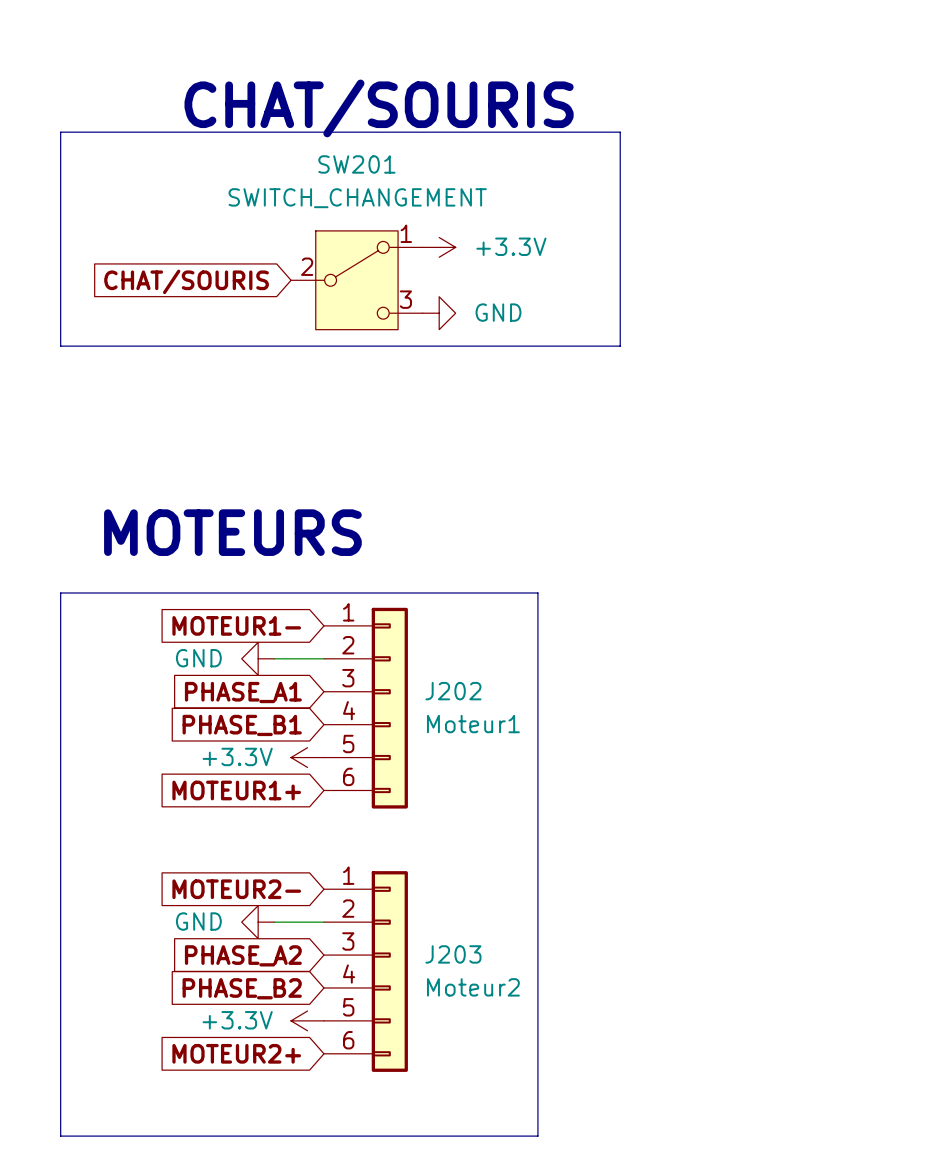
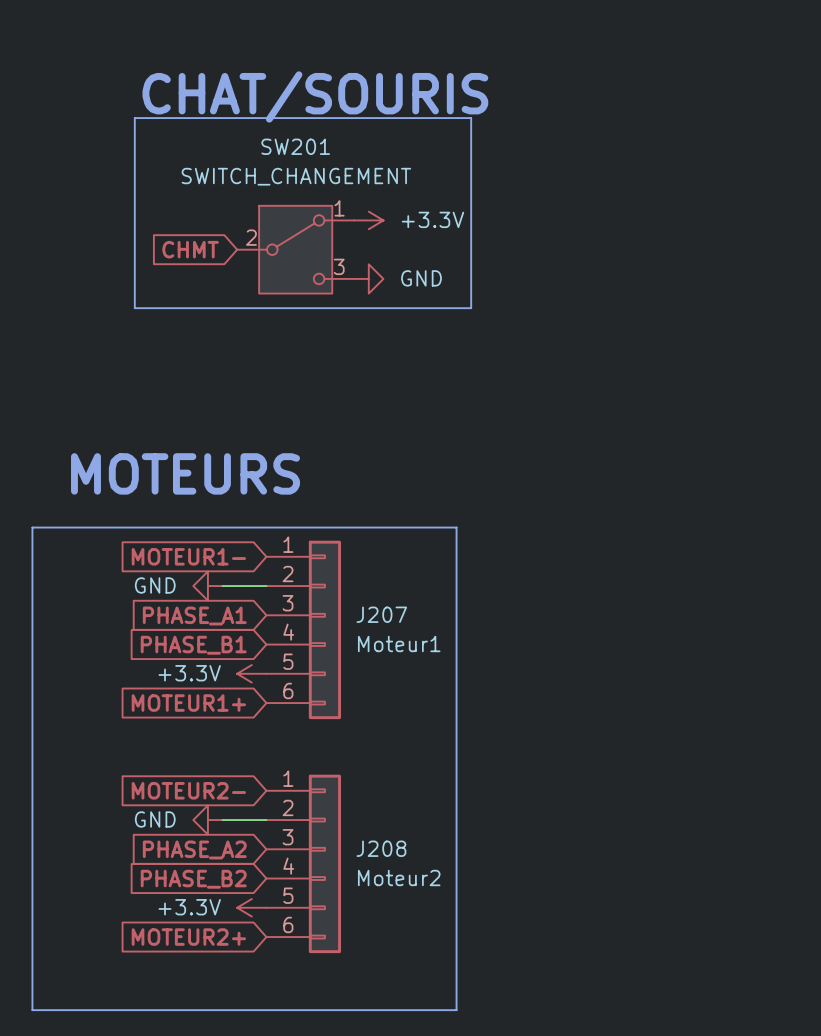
line: (175, 132) (60, 132) (60, 346) (175, 346) -> (134, 118) (134, 308)
line: (554, 132) (620, 132) (620, 346) (554, 346) -> (471, 118) (471, 308)
global label: CHAT/SOURIS (186, 281) -> CHMT (190, 249)
J202 name: J202 (453, 691) -> J207 (381, 614)
J203 name: J203 (453, 954) -> J208 (381, 848)

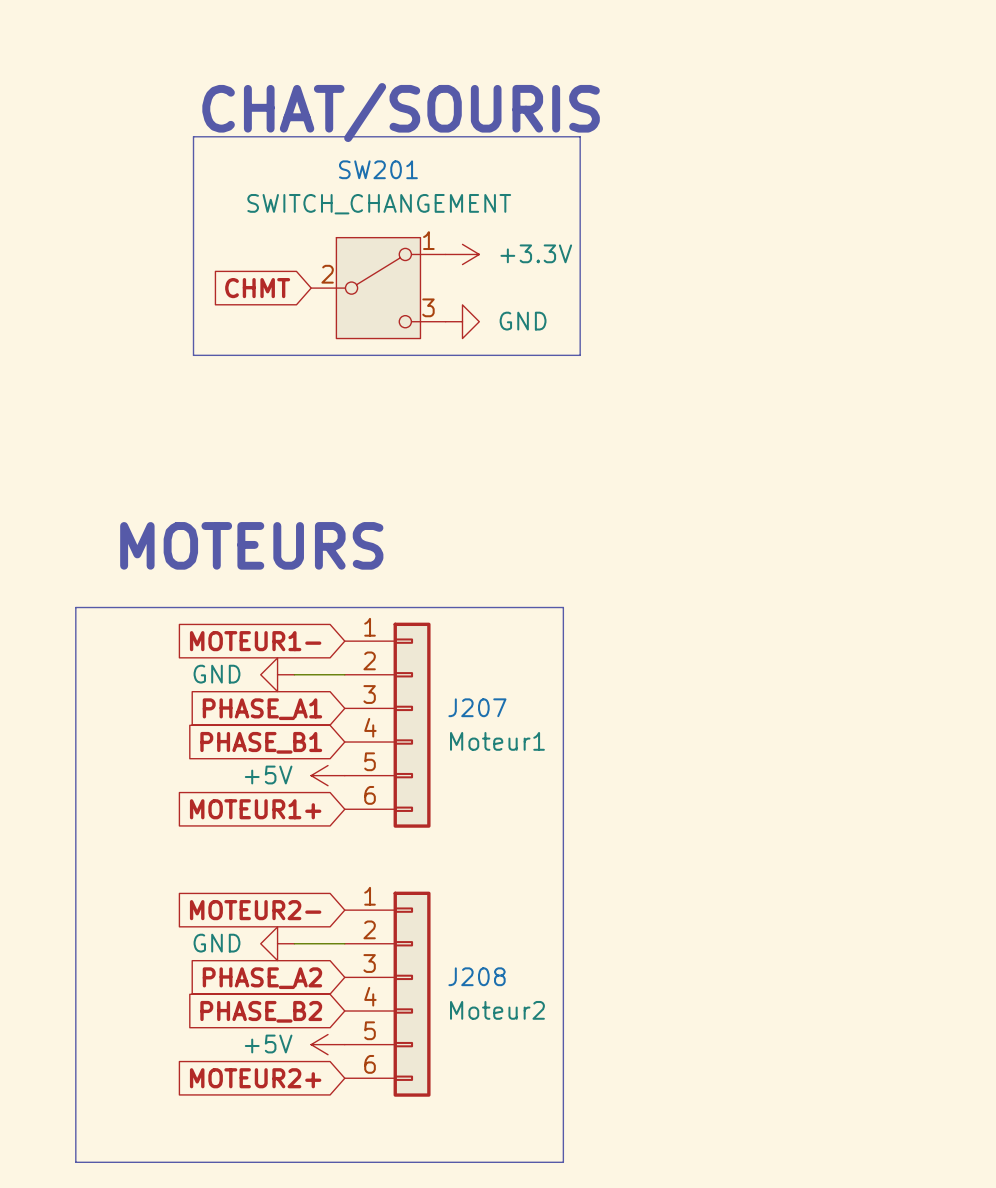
power symbol: +3.3V (251, 673) -> +5V (328, 775)
power symbol: +3.3V (251, 907) -> +5V (328, 1044)

